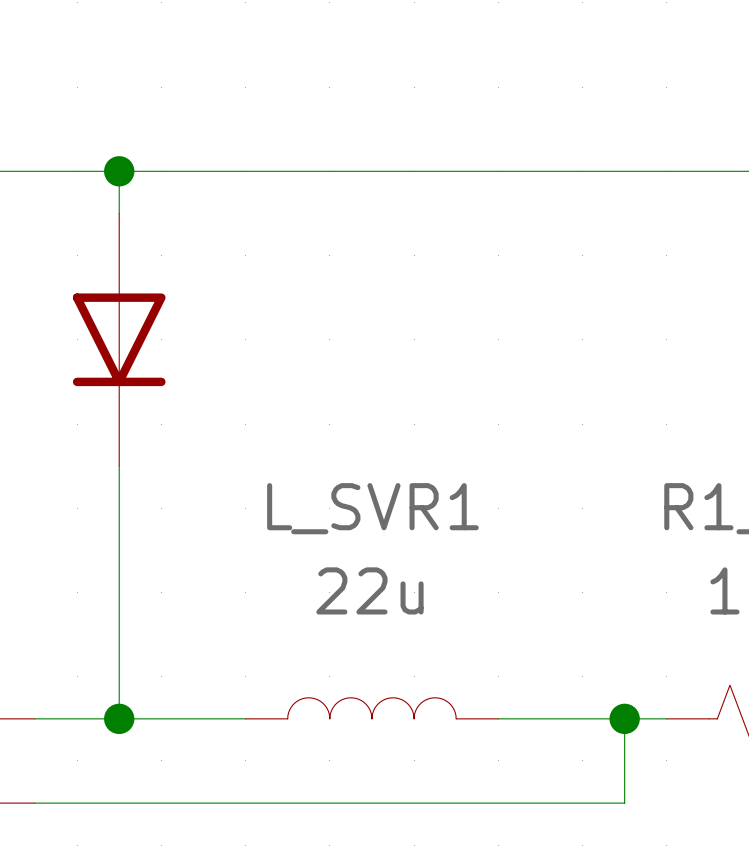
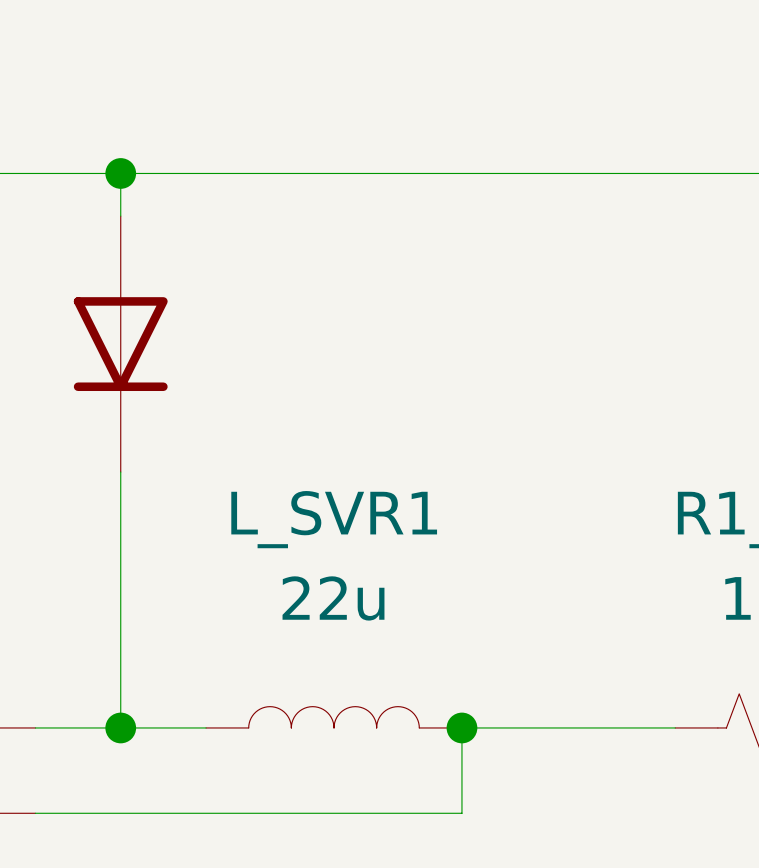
L_SVR1 position: (371, 708) -> (334, 717)
wire: (624, 718) (624, 803) (456, 803) -> (504, 727) (461, 727) (461, 813)
junction position: (624, 718) -> (461, 727)

